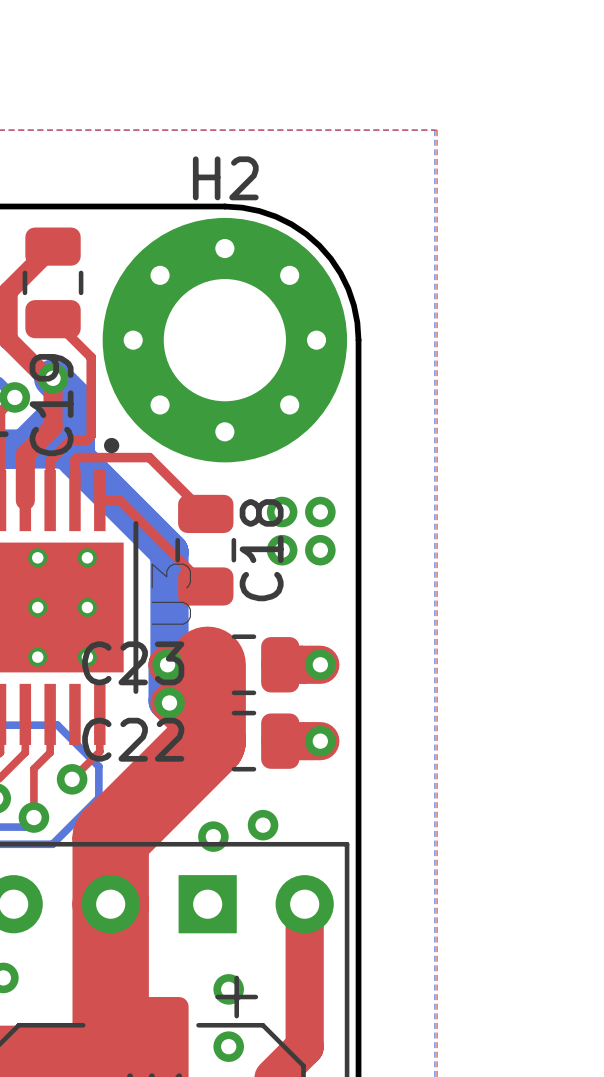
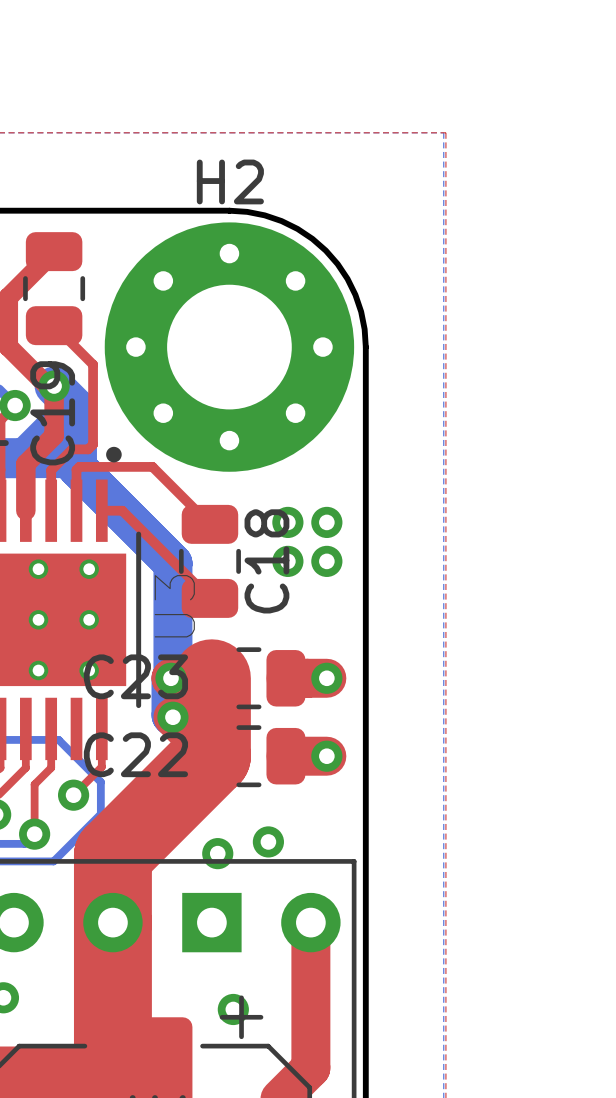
via: (228, 1046) -> none

